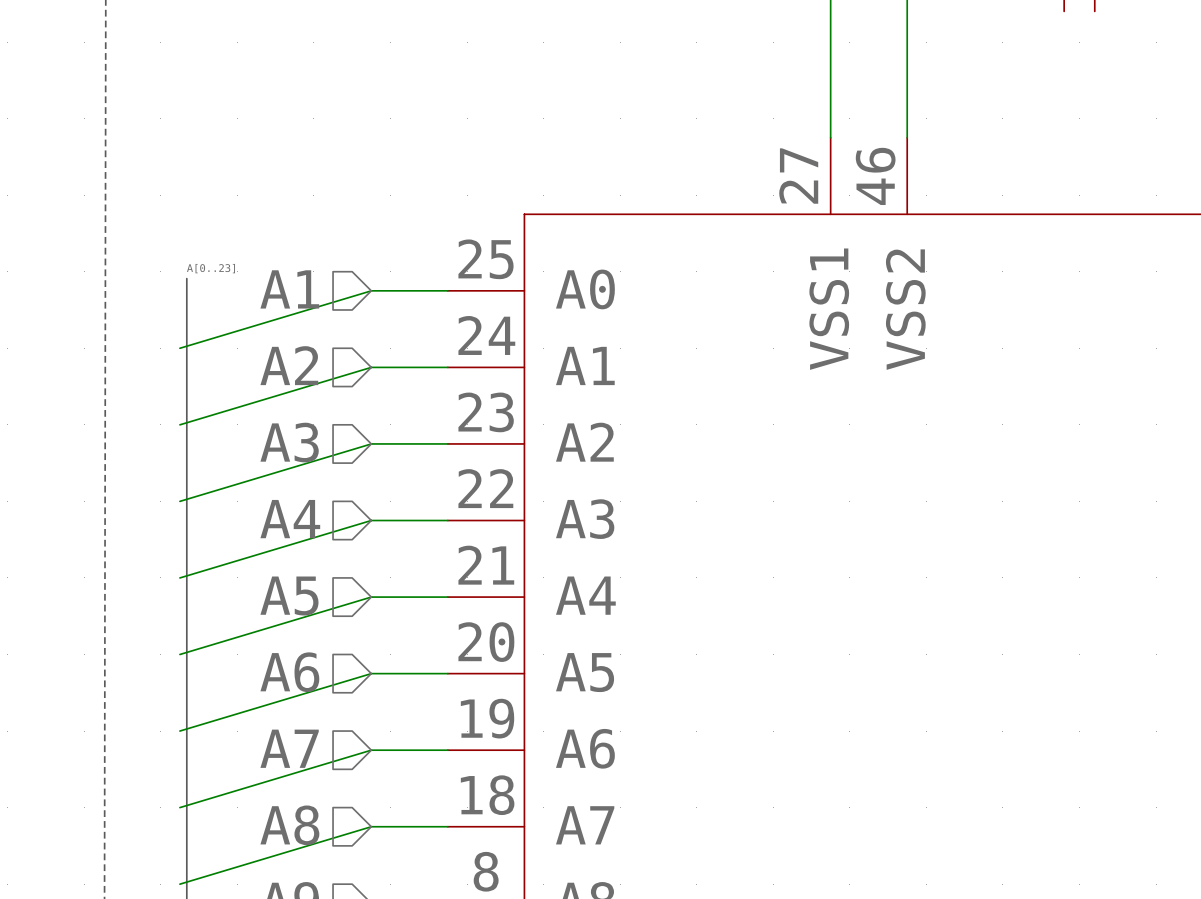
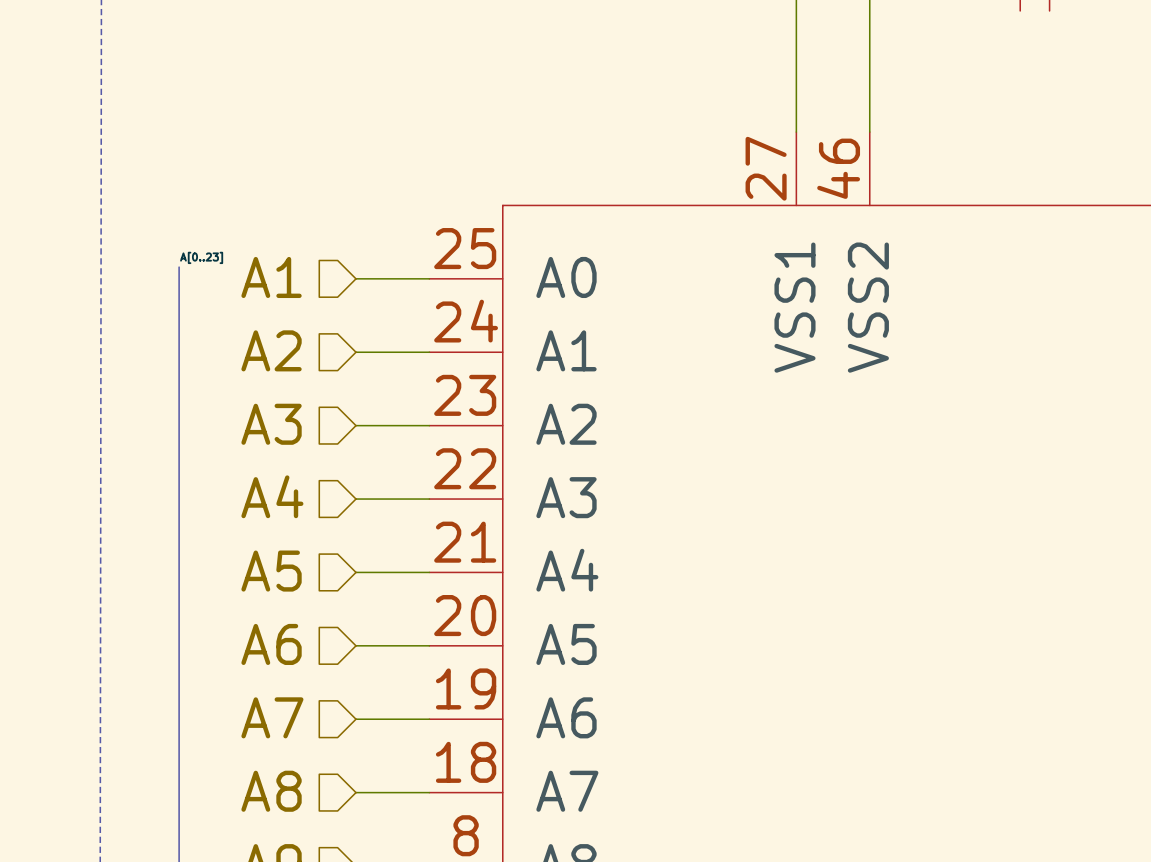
wire: (371, 290) (179, 348) -> none
wire: (371, 367) (179, 424) -> none
wire: (371, 443) (179, 501) -> none
wire: (371, 520) (179, 577) -> none
wire: (371, 597) (179, 654) -> none
wire: (371, 673) (179, 731) -> none
wire: (371, 750) (179, 807) -> none
wire: (371, 826) (179, 884) -> none

